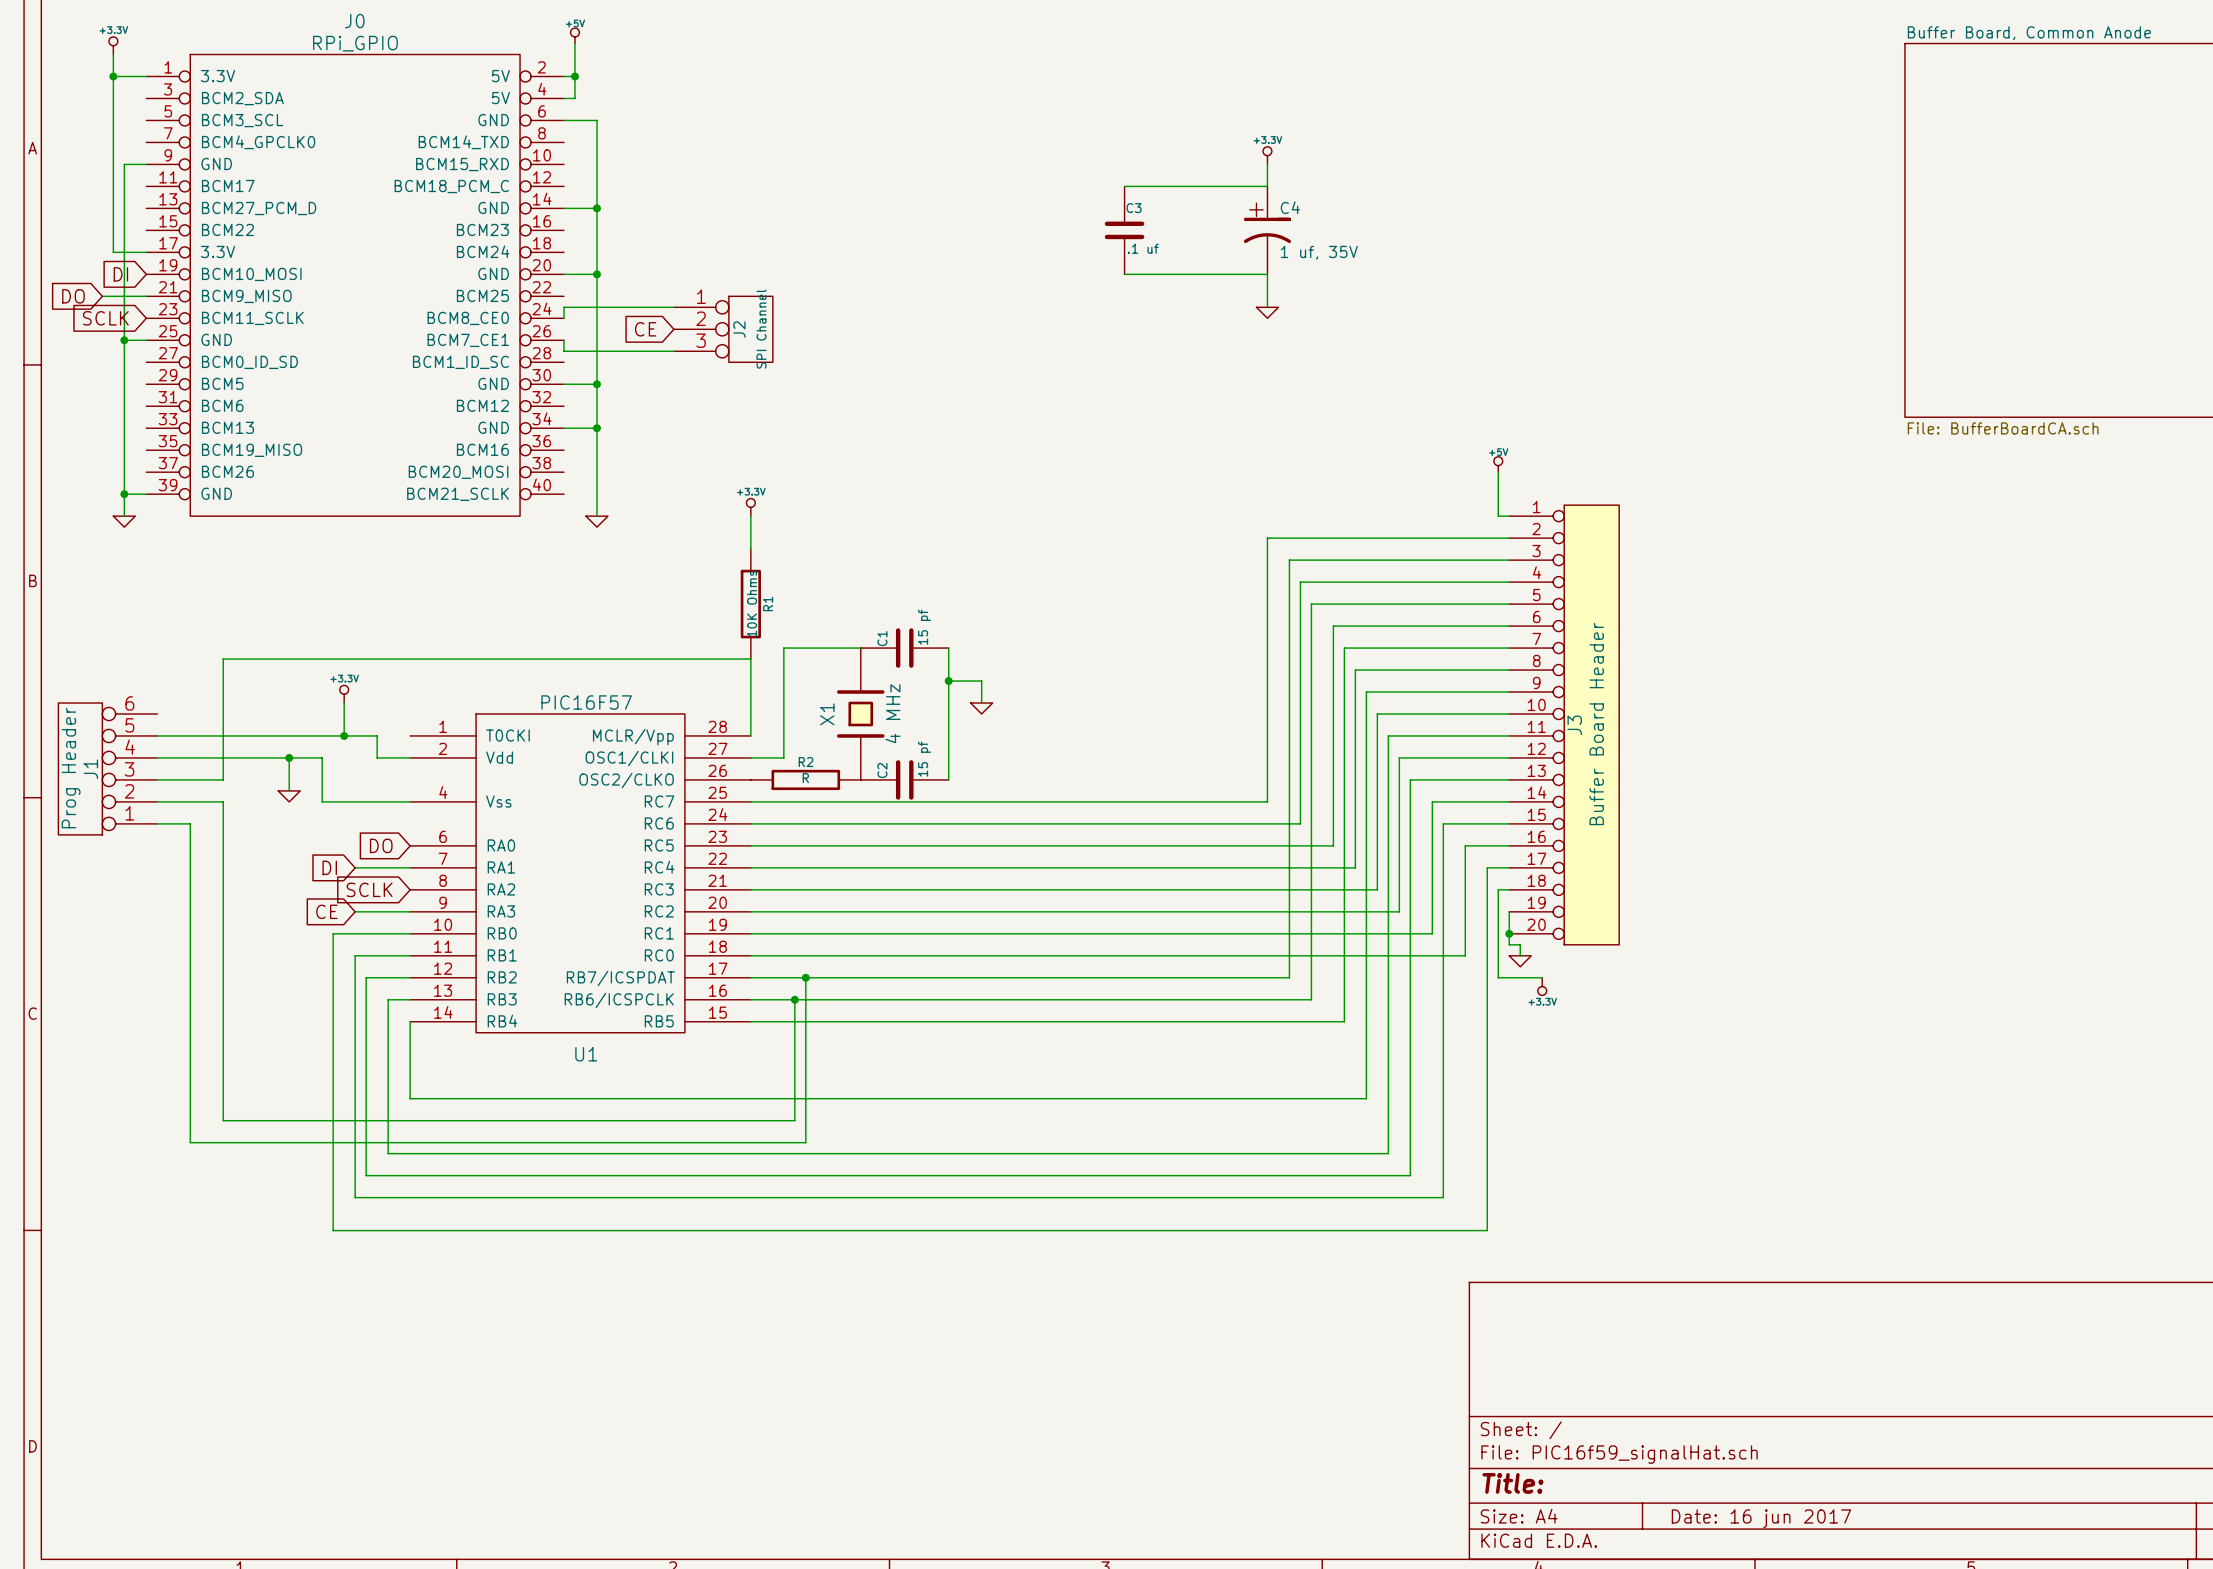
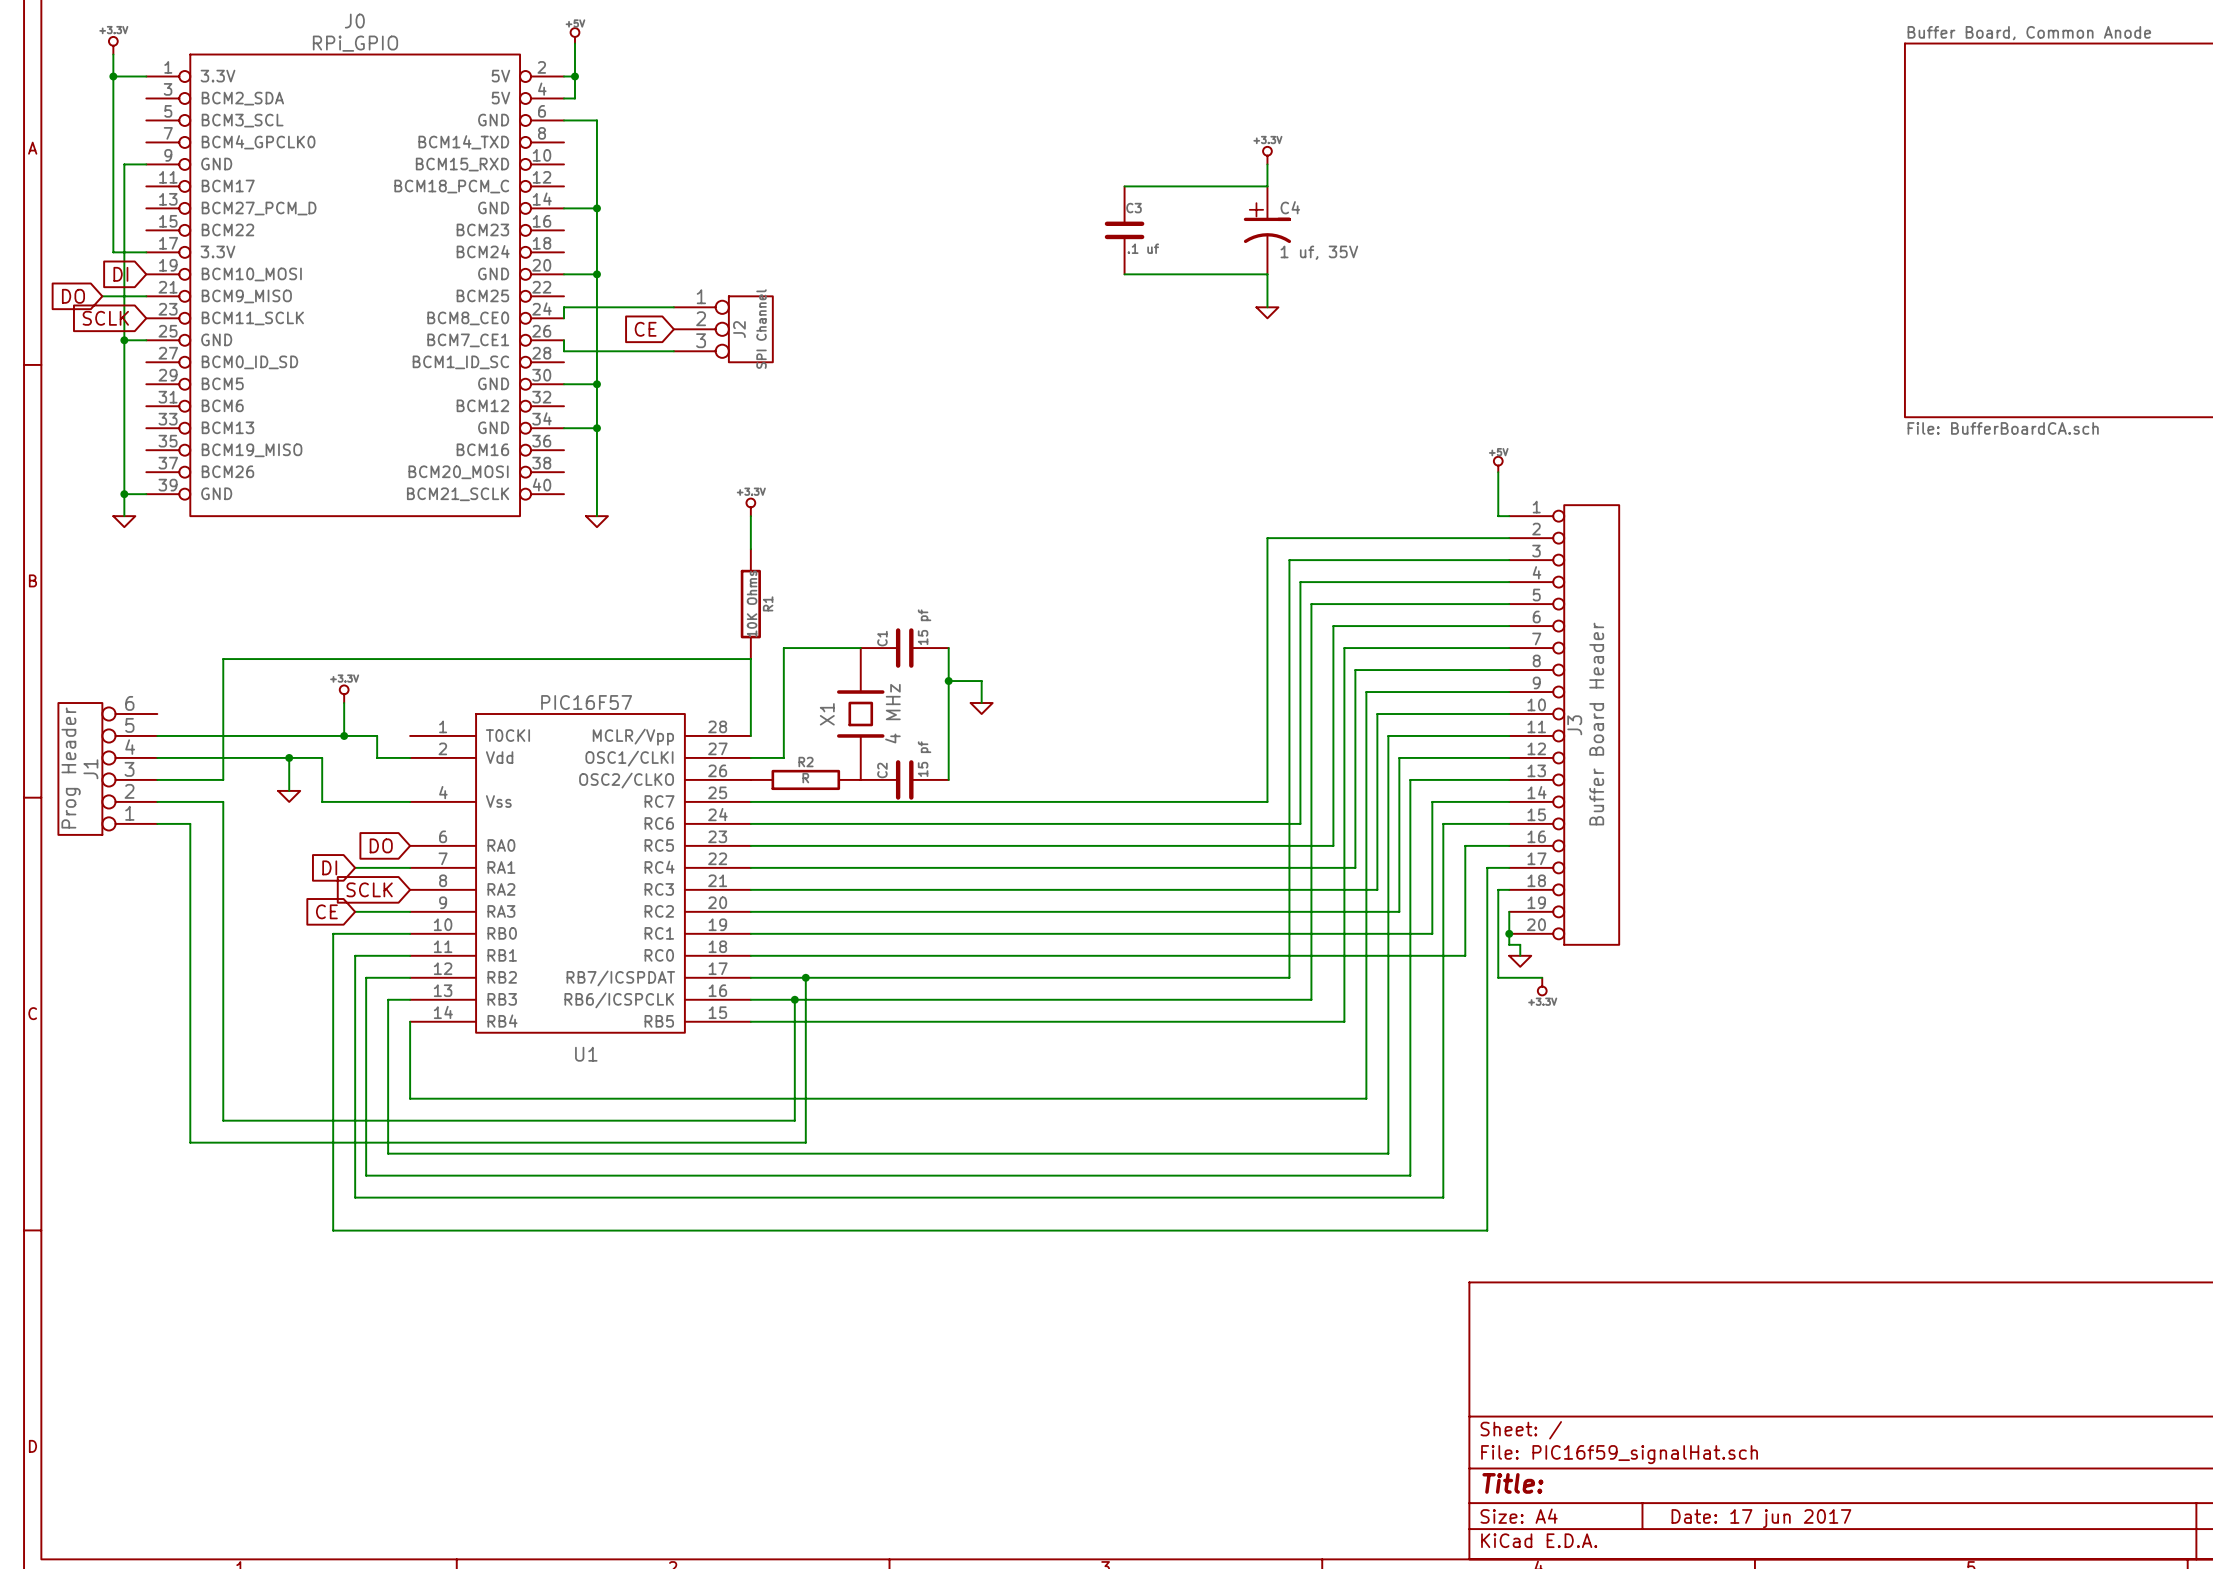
title block: Date: 16 jun 2017 (1761, 1518) -> Date: 17 jun 2017 (1761, 1518)

